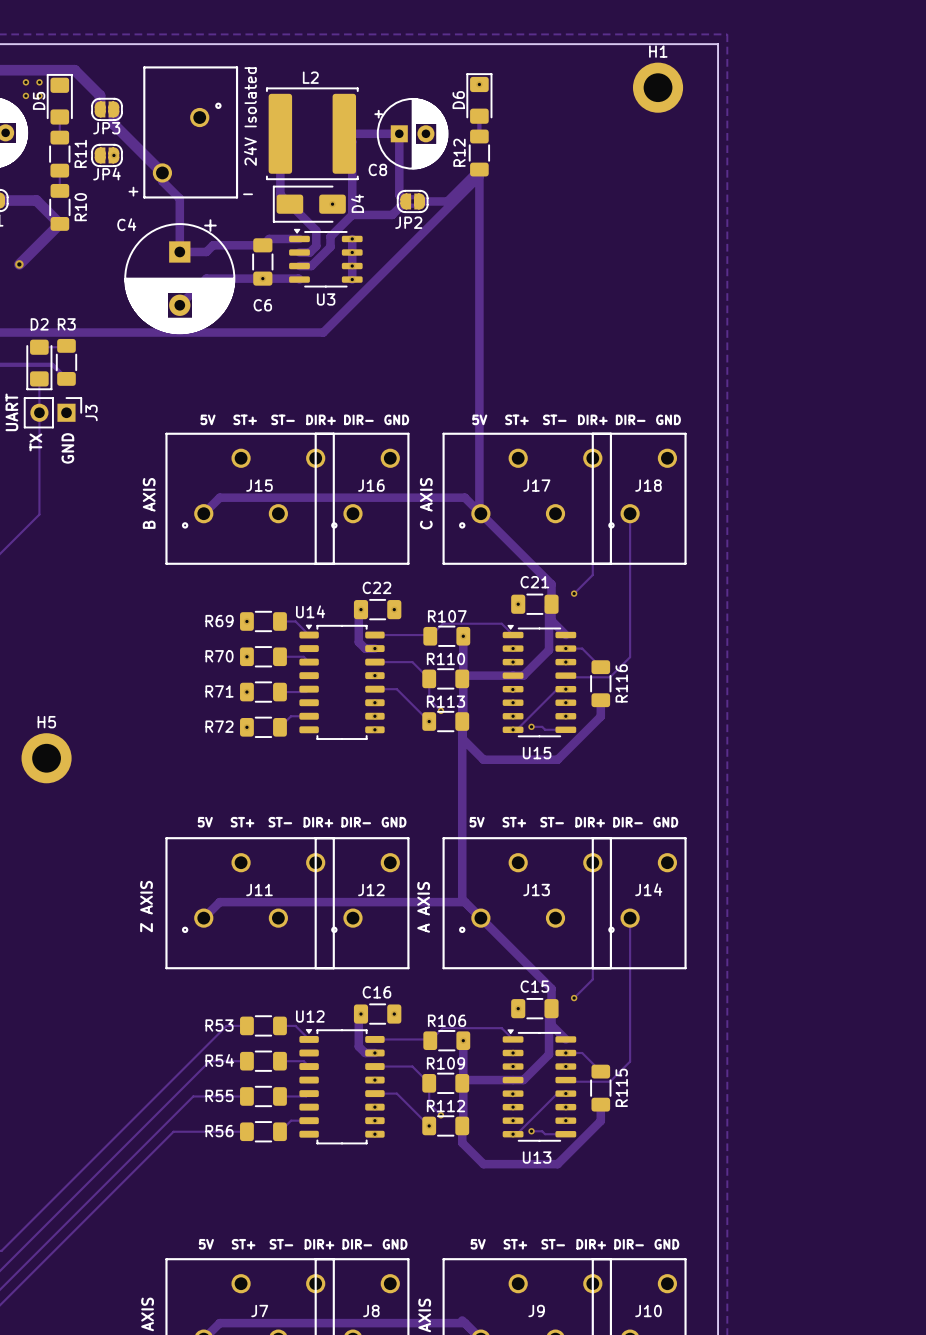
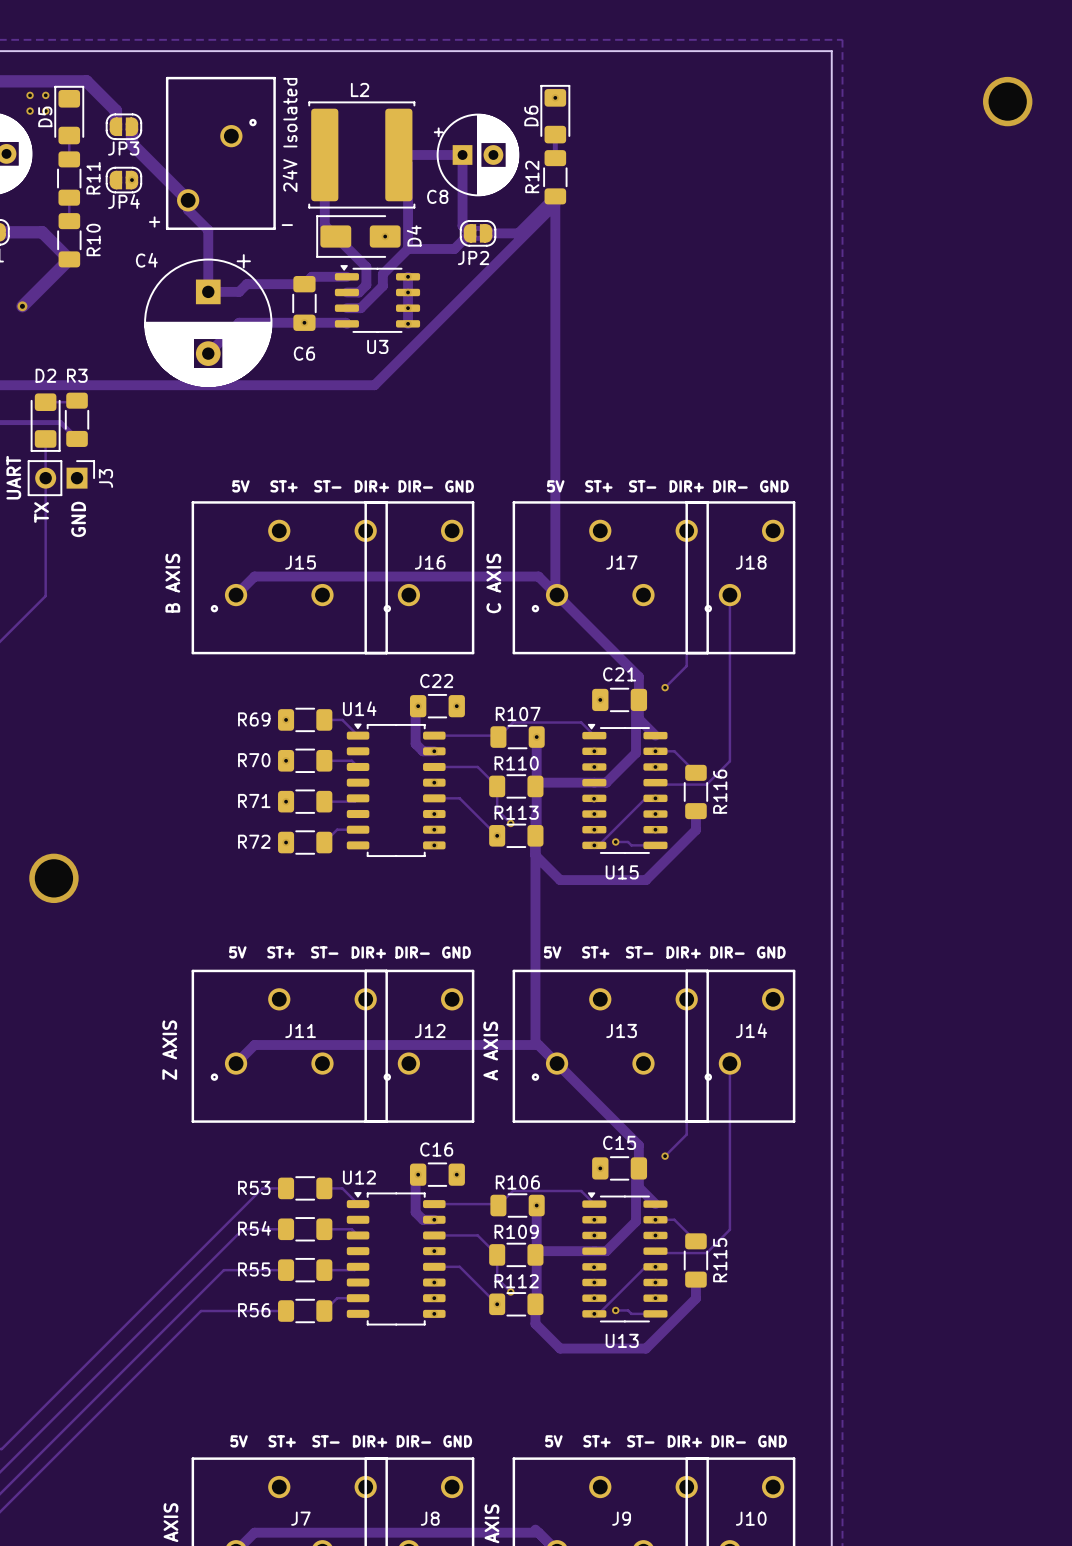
H1: (658, 87) -> none
via: none -> (1007, 101)
H5: (46, 758) -> none
via: none -> (53, 878)

